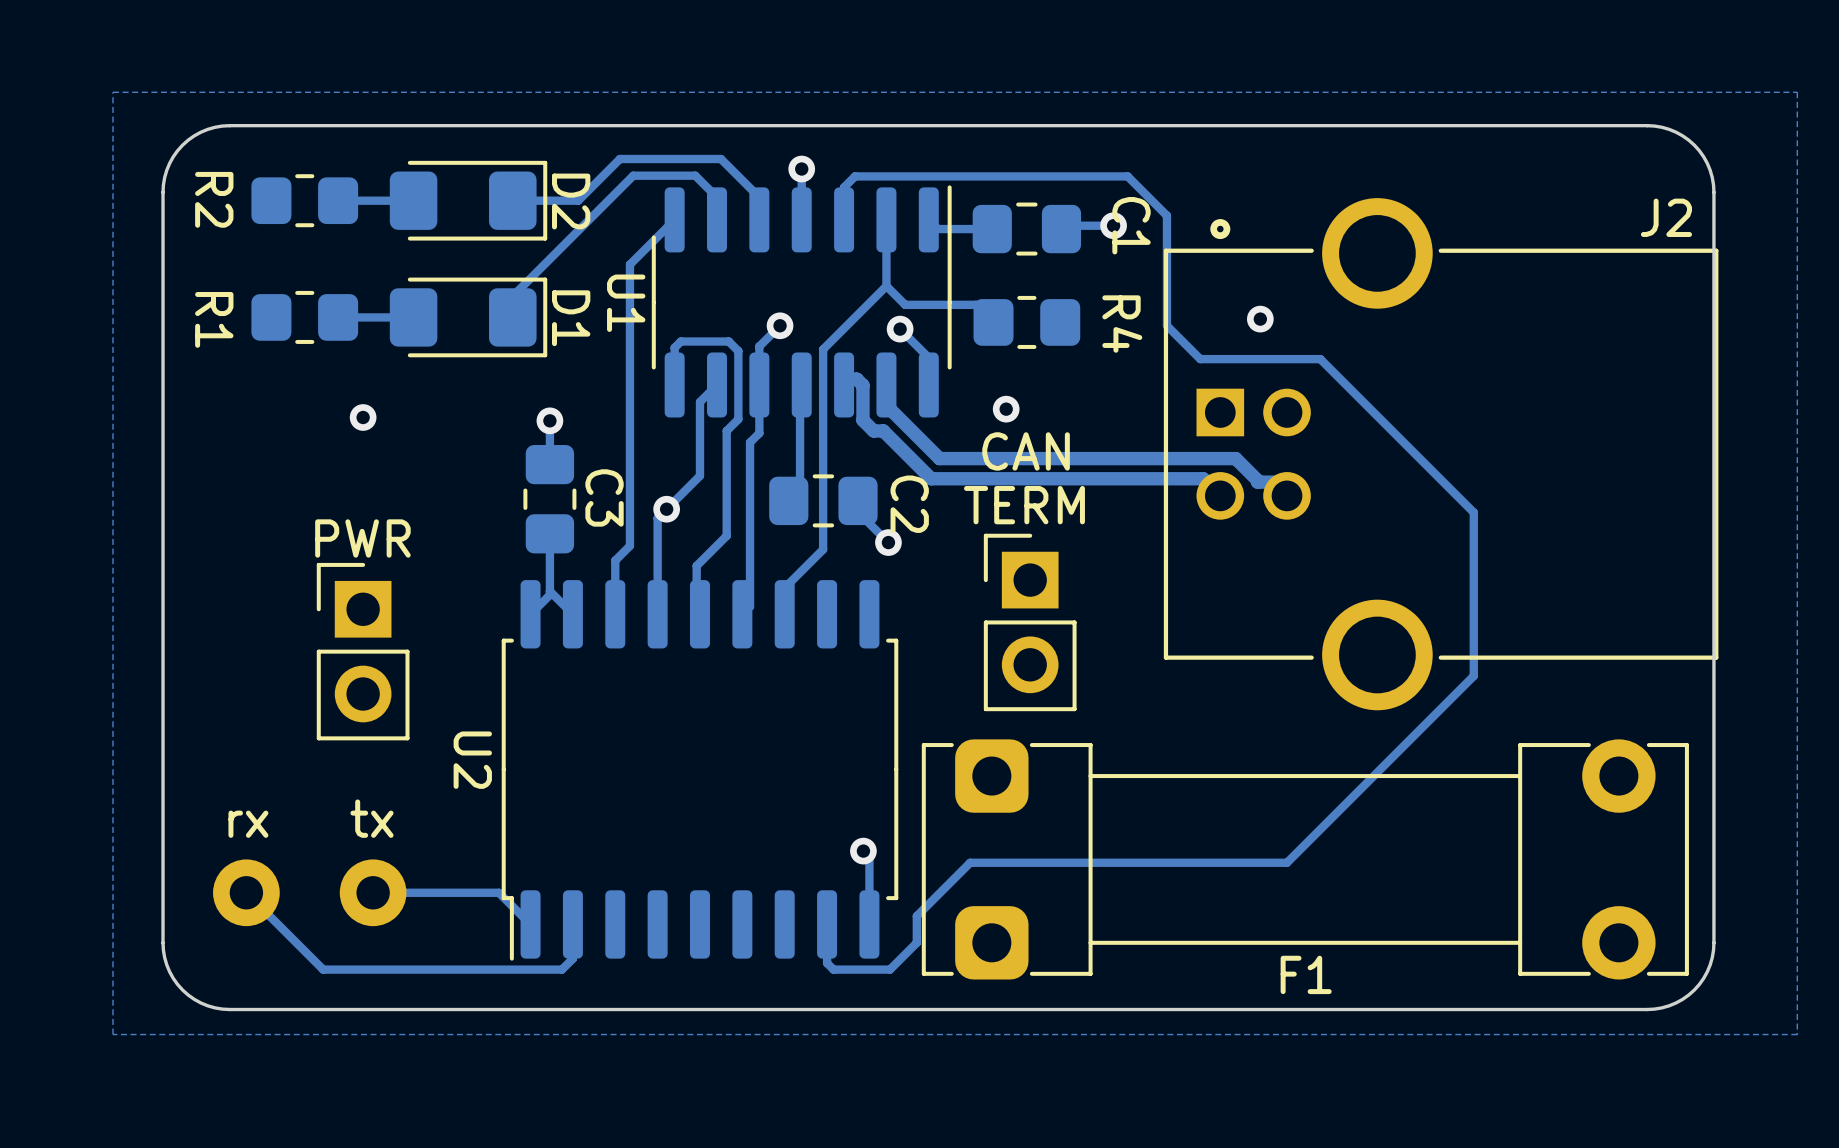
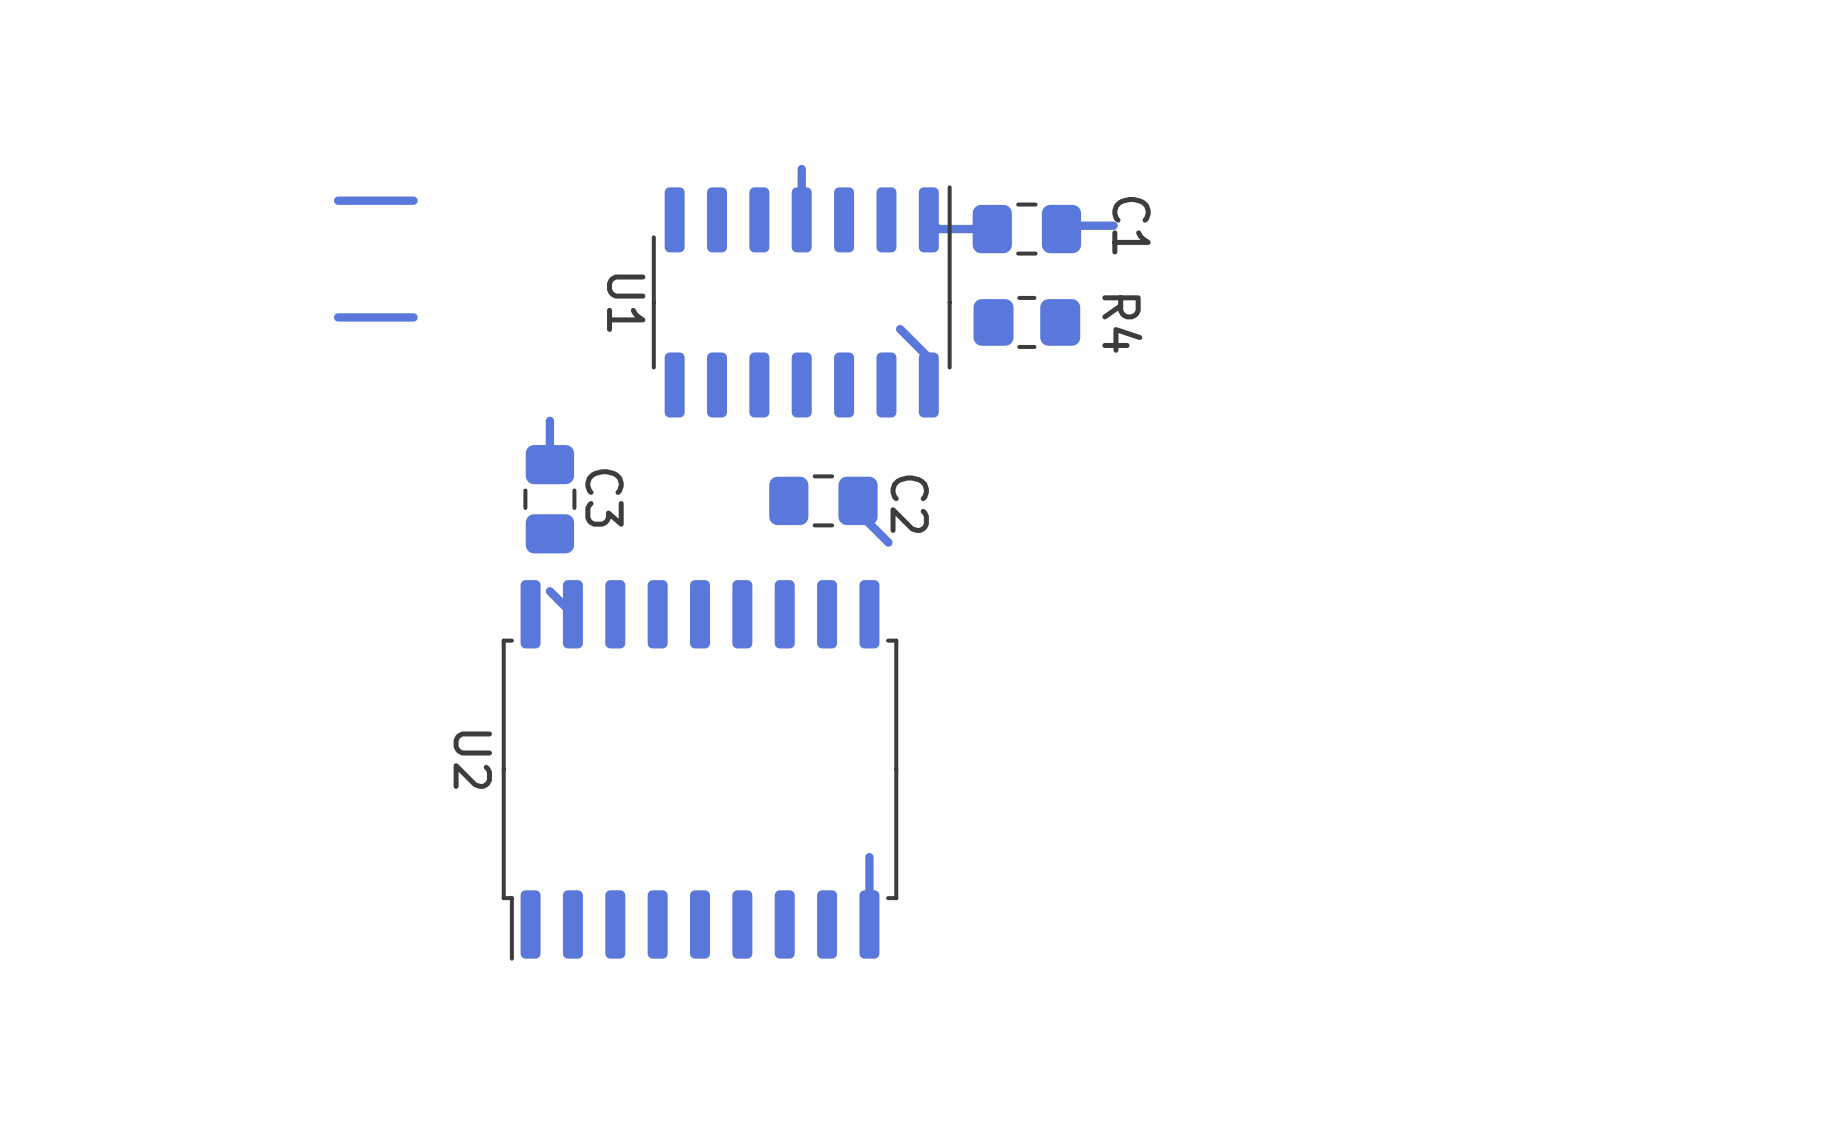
zone outline: (1797, 92) (1797, 1034) (112, 1034) (112, 92) (1797, 92) -> none
board edge: (1647, 125) (229, 125) (207, 129) (194, 135) (182, 145) (173, 156) (166, 170) (163, 192) (163, 942) (166, 964) (173, 978) (182, 989) (194, 999) (207, 1005) (229, 1009) (1647, 1009) (1662, 1007) (1682, 999) (1694, 989) (1703, 978) (1710, 964) (1713, 942) (1713, 192) (1712, 177) (1707, 163) (1694, 145) (1676, 132) (1662, 127) (1647, 125) -> none
via: (801, 169) -> none
R2: (304, 200) -> none
D2: (468, 200) -> none
track: (512, 200) (578, 200) (619, 159) (721, 159) (759, 197) (760, 223) -> none
track: (674, 219) (629, 264) (629, 545) (615, 560) (615, 614) -> none
track: (717, 219) (717, 197) (695, 175) (633, 175) (512, 296) (512, 317) -> none
track: (844, 219) (844, 187) (855, 176) (1127, 176) (1166, 215) (1166, 325) (1200, 359) (1320, 359) (1473, 512) (1473, 675) (1287, 862) (970, 862) (916, 916) (916, 942) (890, 969) (833, 969) (827, 963) (827, 924) -> none
track: (886, 219) (886, 286) -> none
via: (1113, 225) -> none
track: (886, 286) (823, 349) (823, 549) (784, 587) (784, 614) (781, 611) -> none
track: (886, 286) (905, 304) (975, 304) (993, 322) -> none
R1: (304, 317) -> none
D1: (468, 317) -> none
via: (1260, 319) -> none
track: (780, 325) (759, 346) (759, 433) (750, 442) (750, 606) (742, 614) -> none
via: (780, 325) -> none
via: (900, 329) -> none
track: (674, 384) (674, 347) (680, 341) (728, 341) (738, 351) (738, 419) (726, 430) (726, 535) (696, 565) (696, 610) (700, 614) -> none
track: (717, 384) (700, 401) (700, 475) (657, 518) (658, 613) -> none
track: (801, 384) (800, 386) (800, 489) (788, 500) -> none
track: (844, 384) (849, 379) (856, 379) (862, 385) (862, 420) (873, 430) (883, 430) (931, 478) (1203, 478) (1220, 495) -> none
track: (886, 384) (886, 405) (939, 458) (1235, 458) (1257, 482) (1287, 482) -> none
via: (1006, 409) -> none
via: (363, 417) -> none
via: (549, 420) -> none
text: CAN (1026, 451) -> none
J2: (1441, 454) -> none
text: TERM (1024, 505) -> none
via: (666, 509) -> none
track: (549, 533) (549, 594) (530, 614) -> none
text: PWR (362, 538) -> none
via: (888, 542) -> none
part: (1030, 622) -> none
part: (363, 651) -> none
text: tx (371, 818) -> none
text: rx (248, 824) -> none
via: (863, 851) -> none
F1: (1305, 859) -> none
track: (246, 892) (323, 969) (561, 969) (572, 958) (572, 924) -> none
part: (246, 892) -> none
track: (373, 892) (498, 892) (530, 924) -> none
part: (373, 892) -> none

